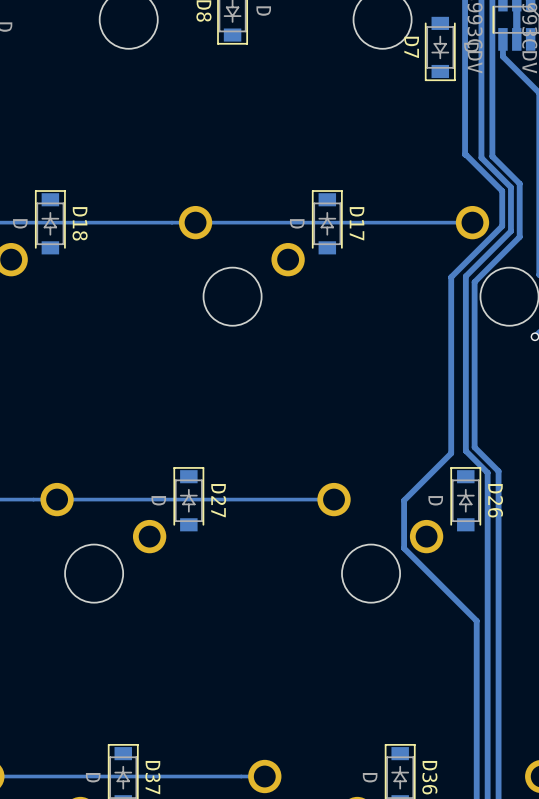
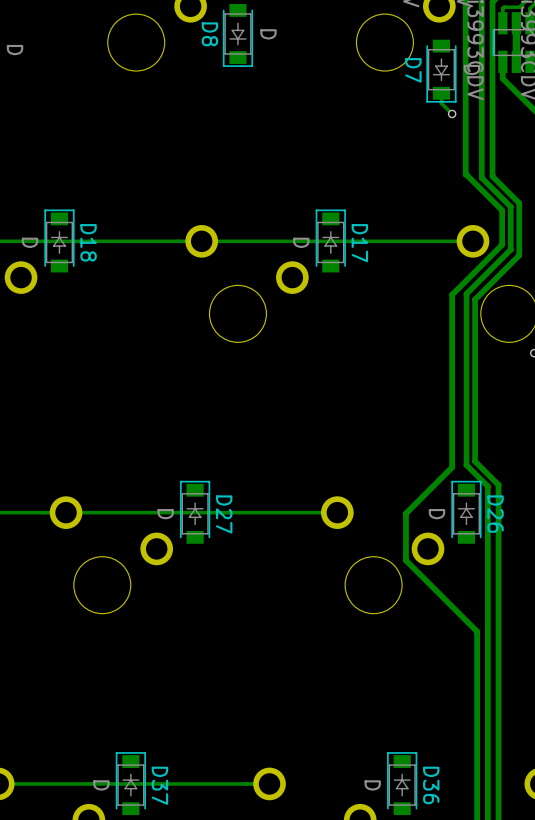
track: none -> (441, 93) (441, 103) (452, 113)
via: none -> (452, 113)

